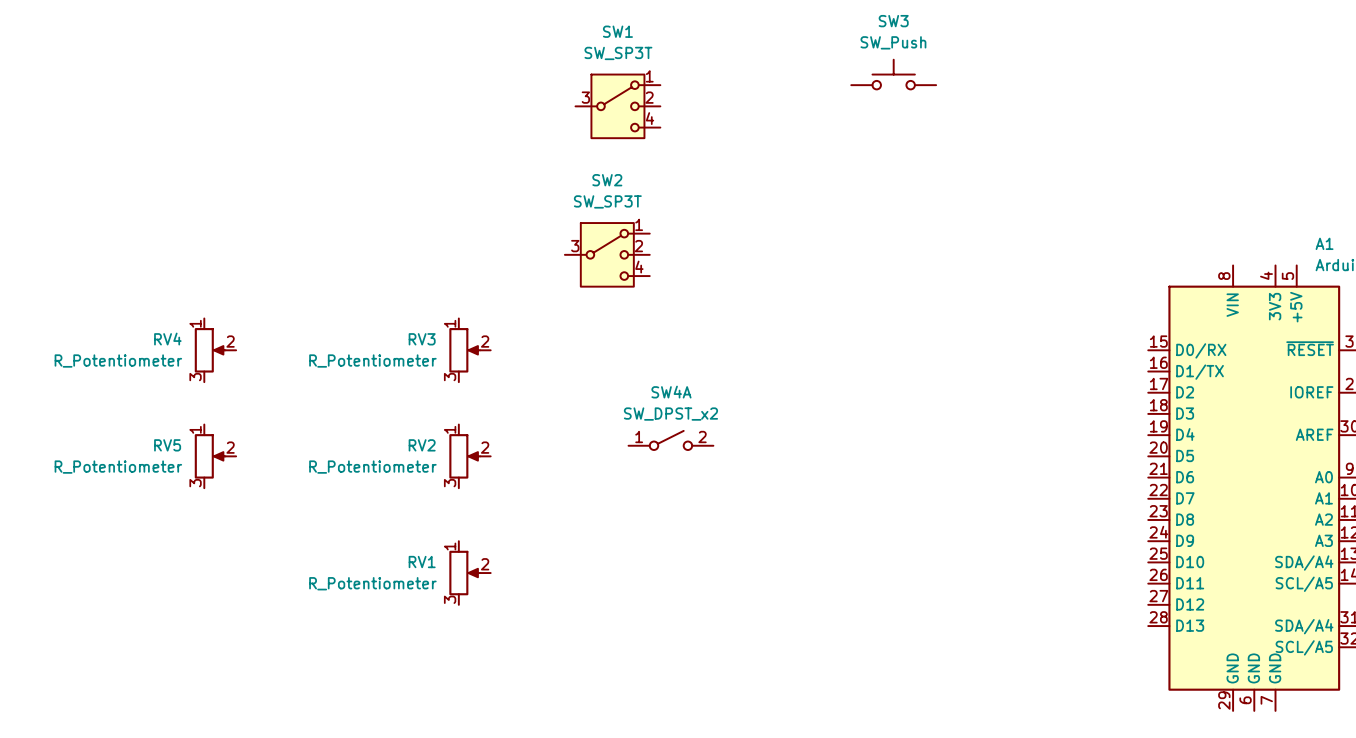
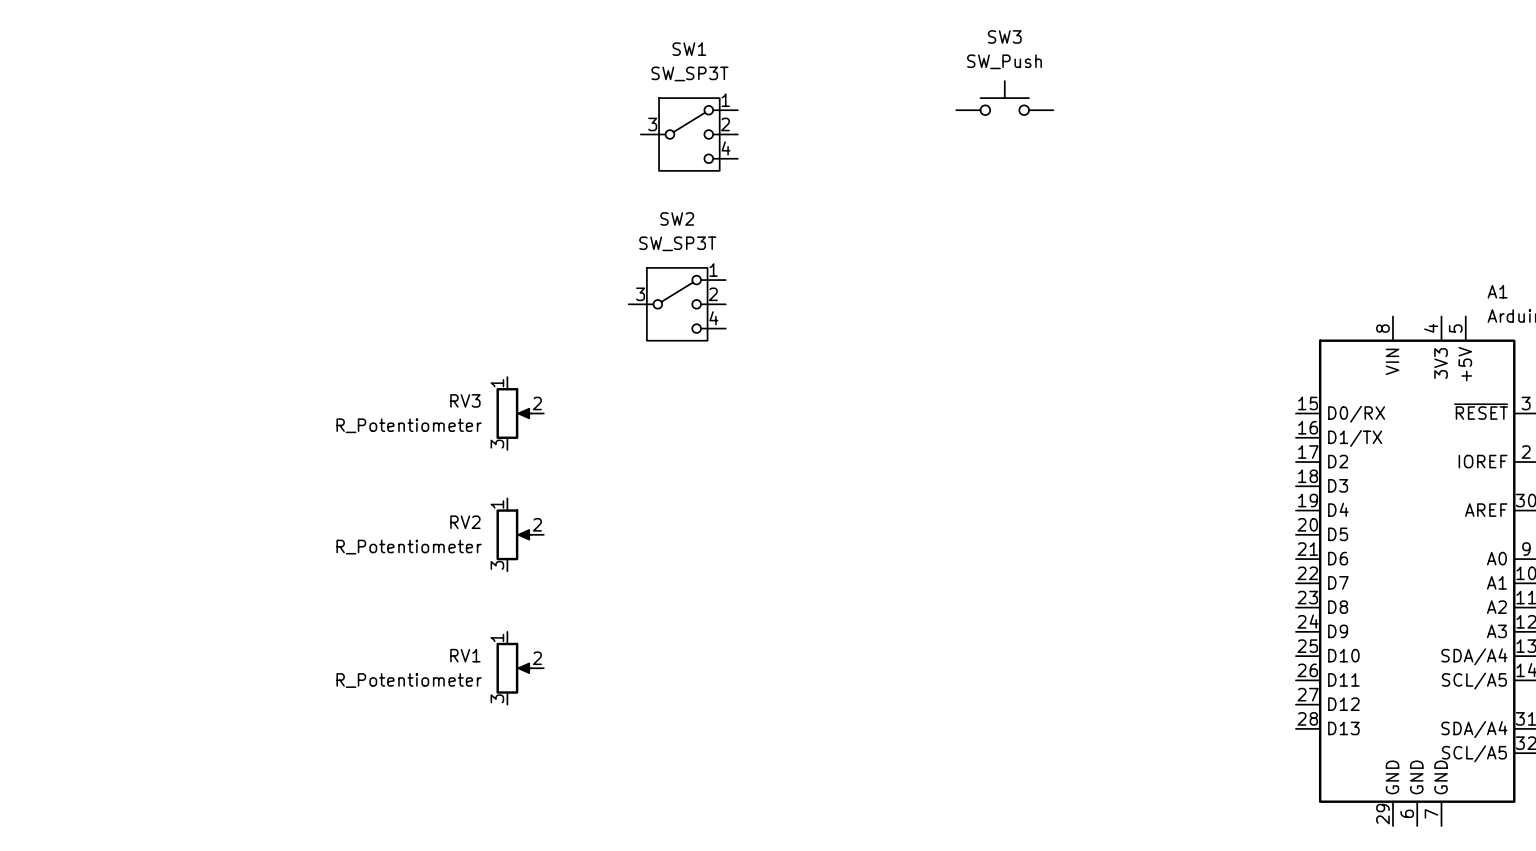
RV4: R_Potentiometer (215, 350) -> none
SW4A: SW_DPST_x2 (670, 440) -> none
RV5: R_Potentiometer (215, 456) -> none

